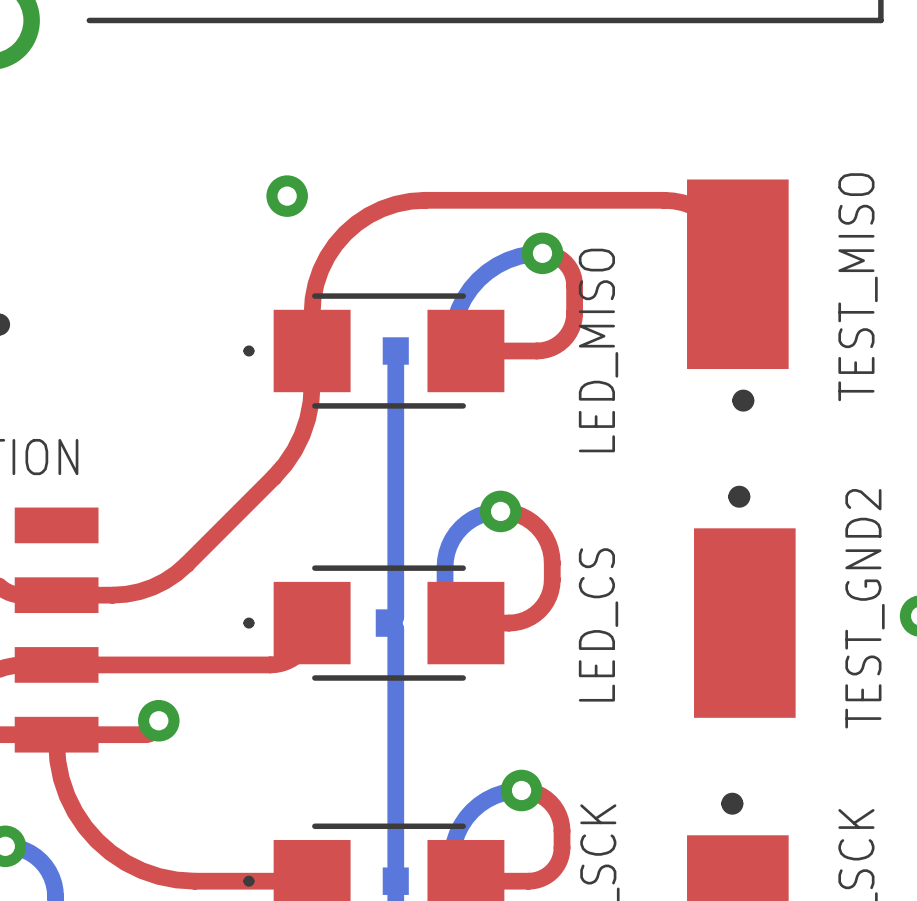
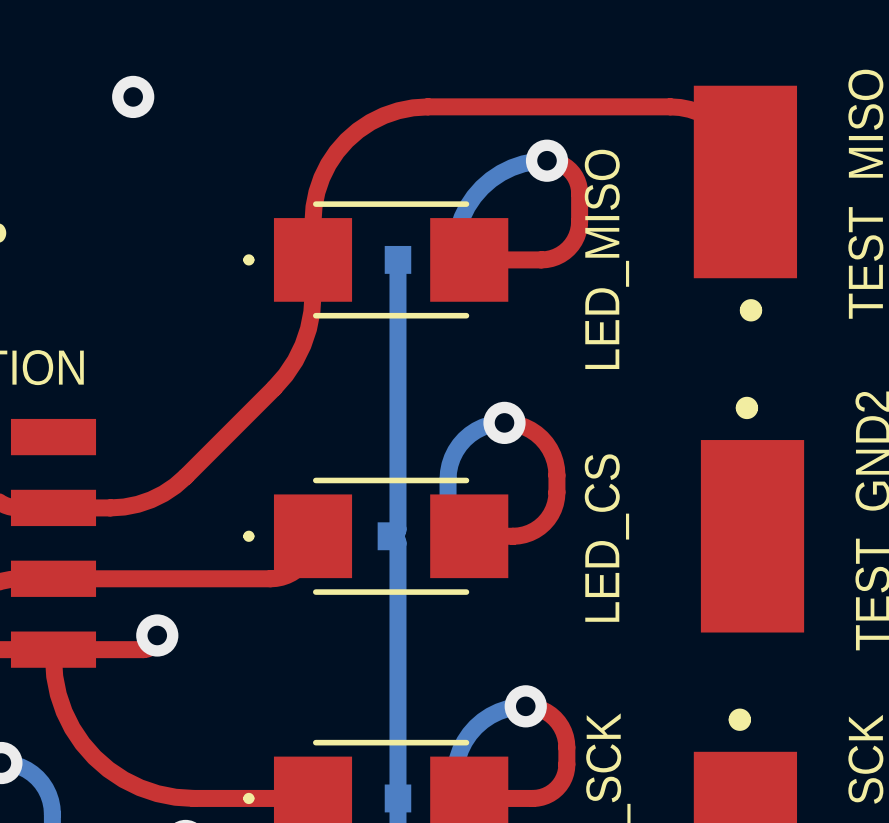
via position: (287, 196) -> (133, 96)

